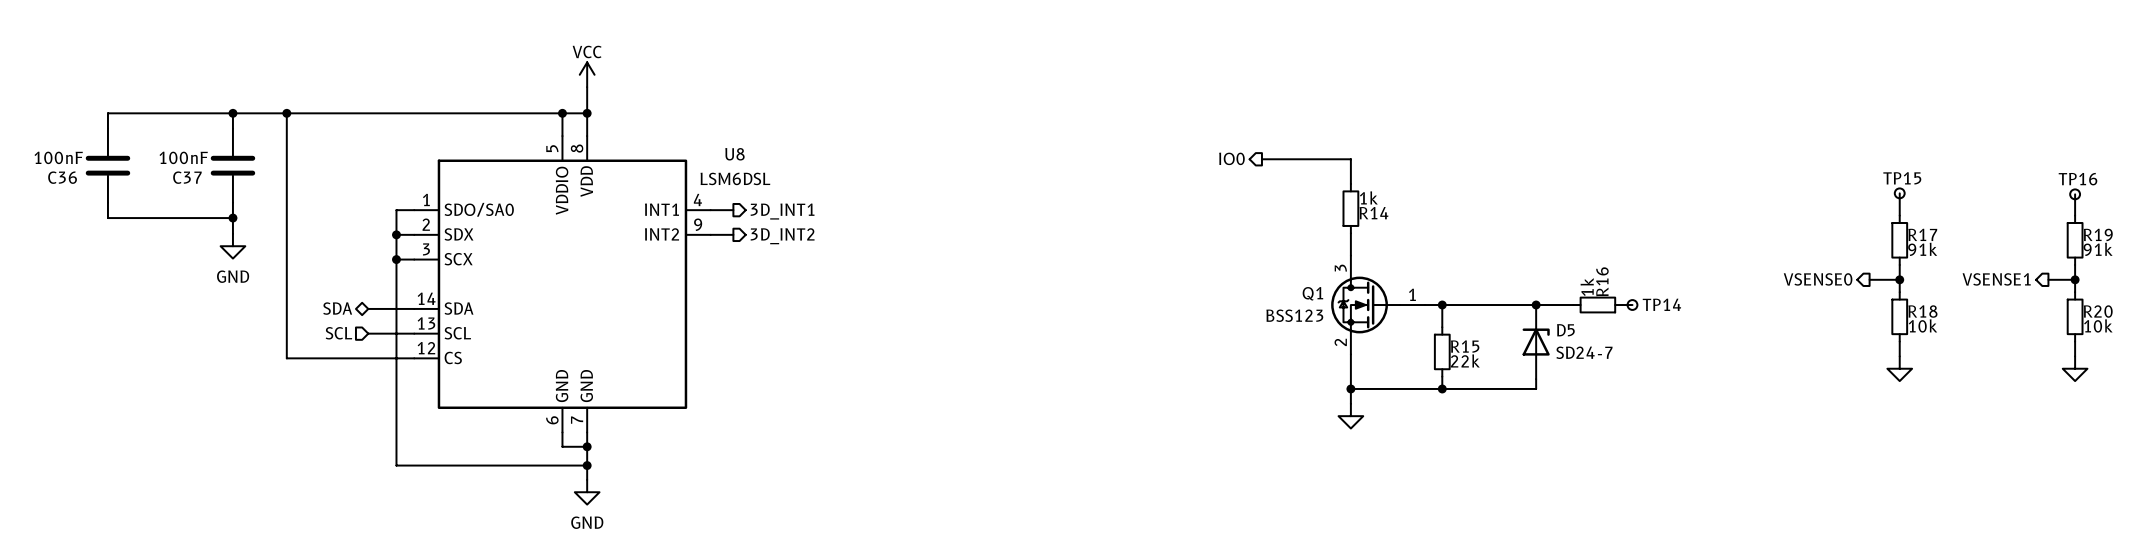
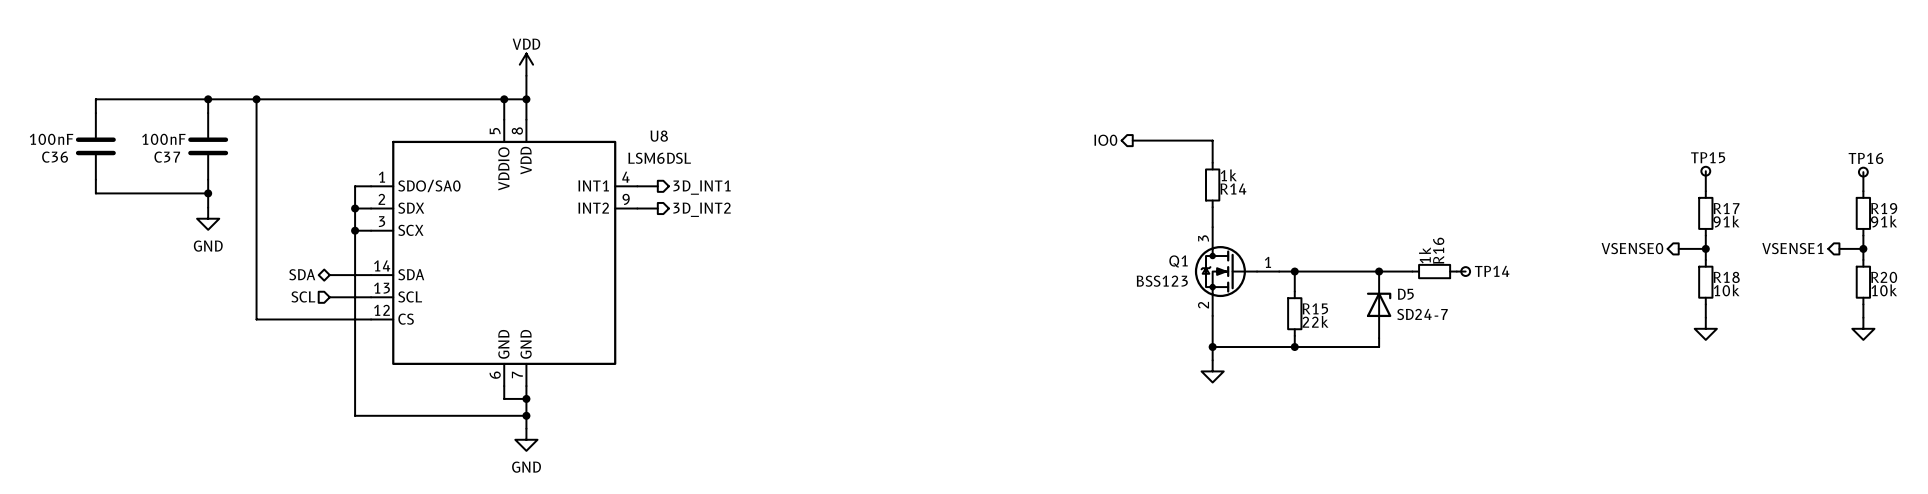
power symbol: VCC (587, 74) -> VDD (526, 64)

